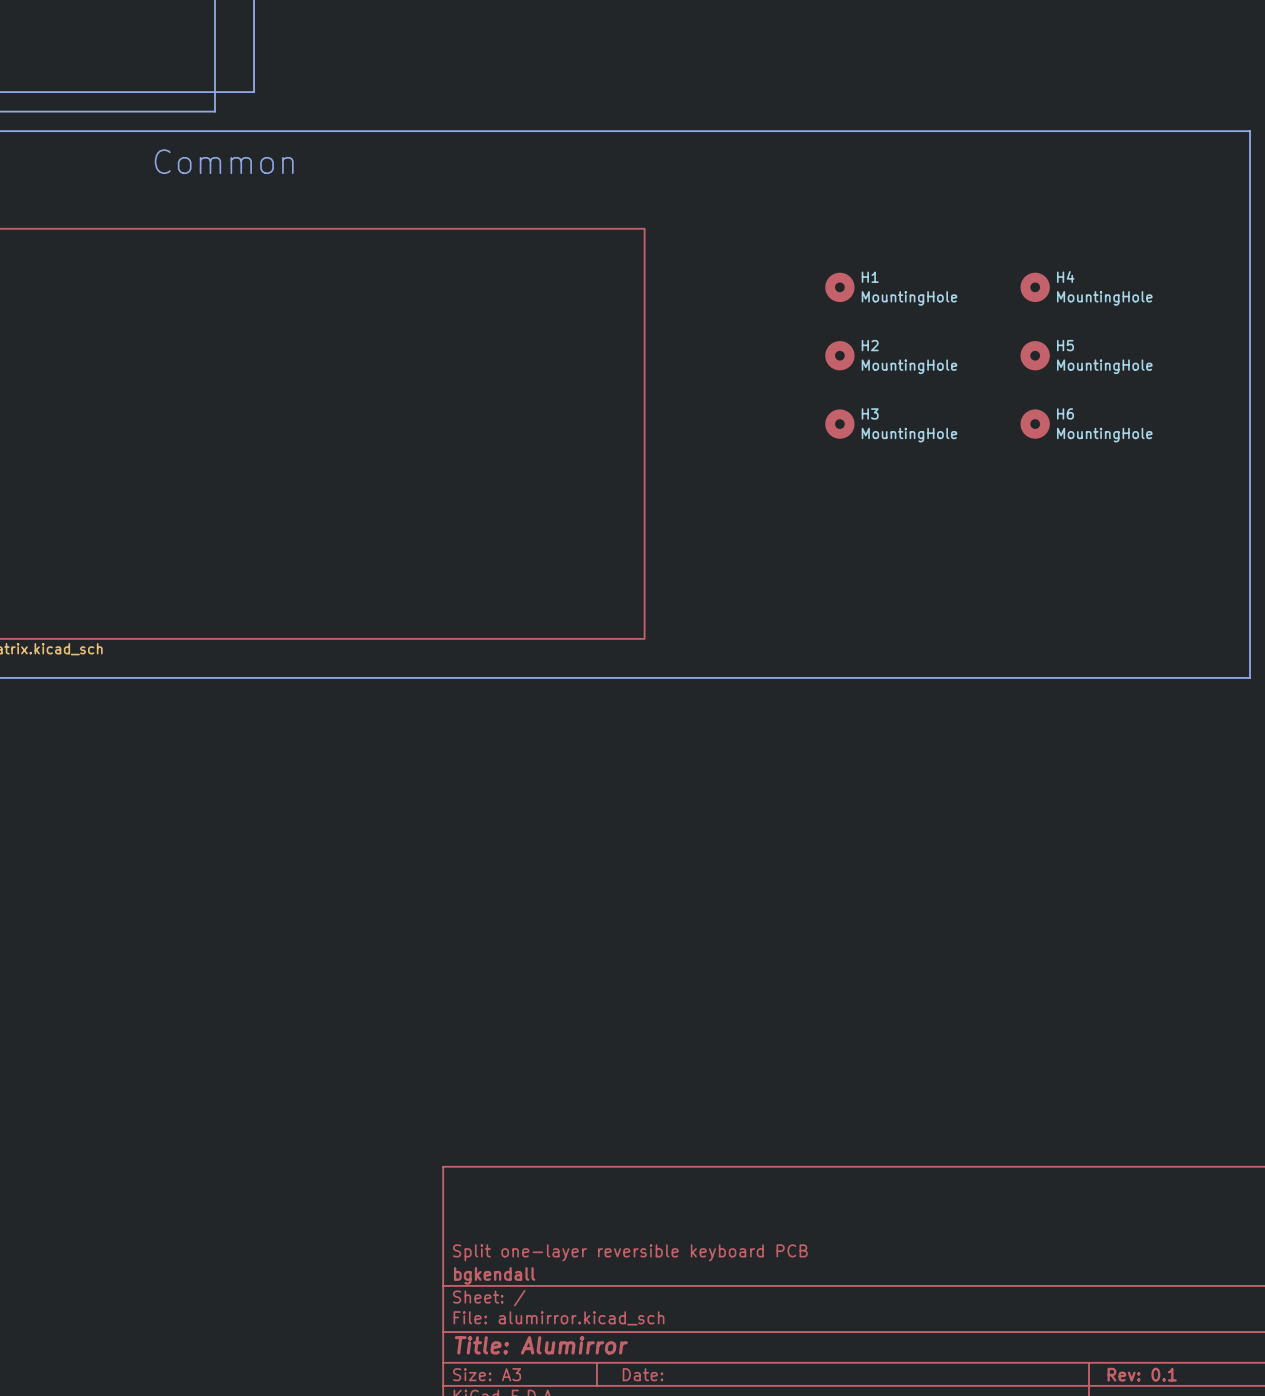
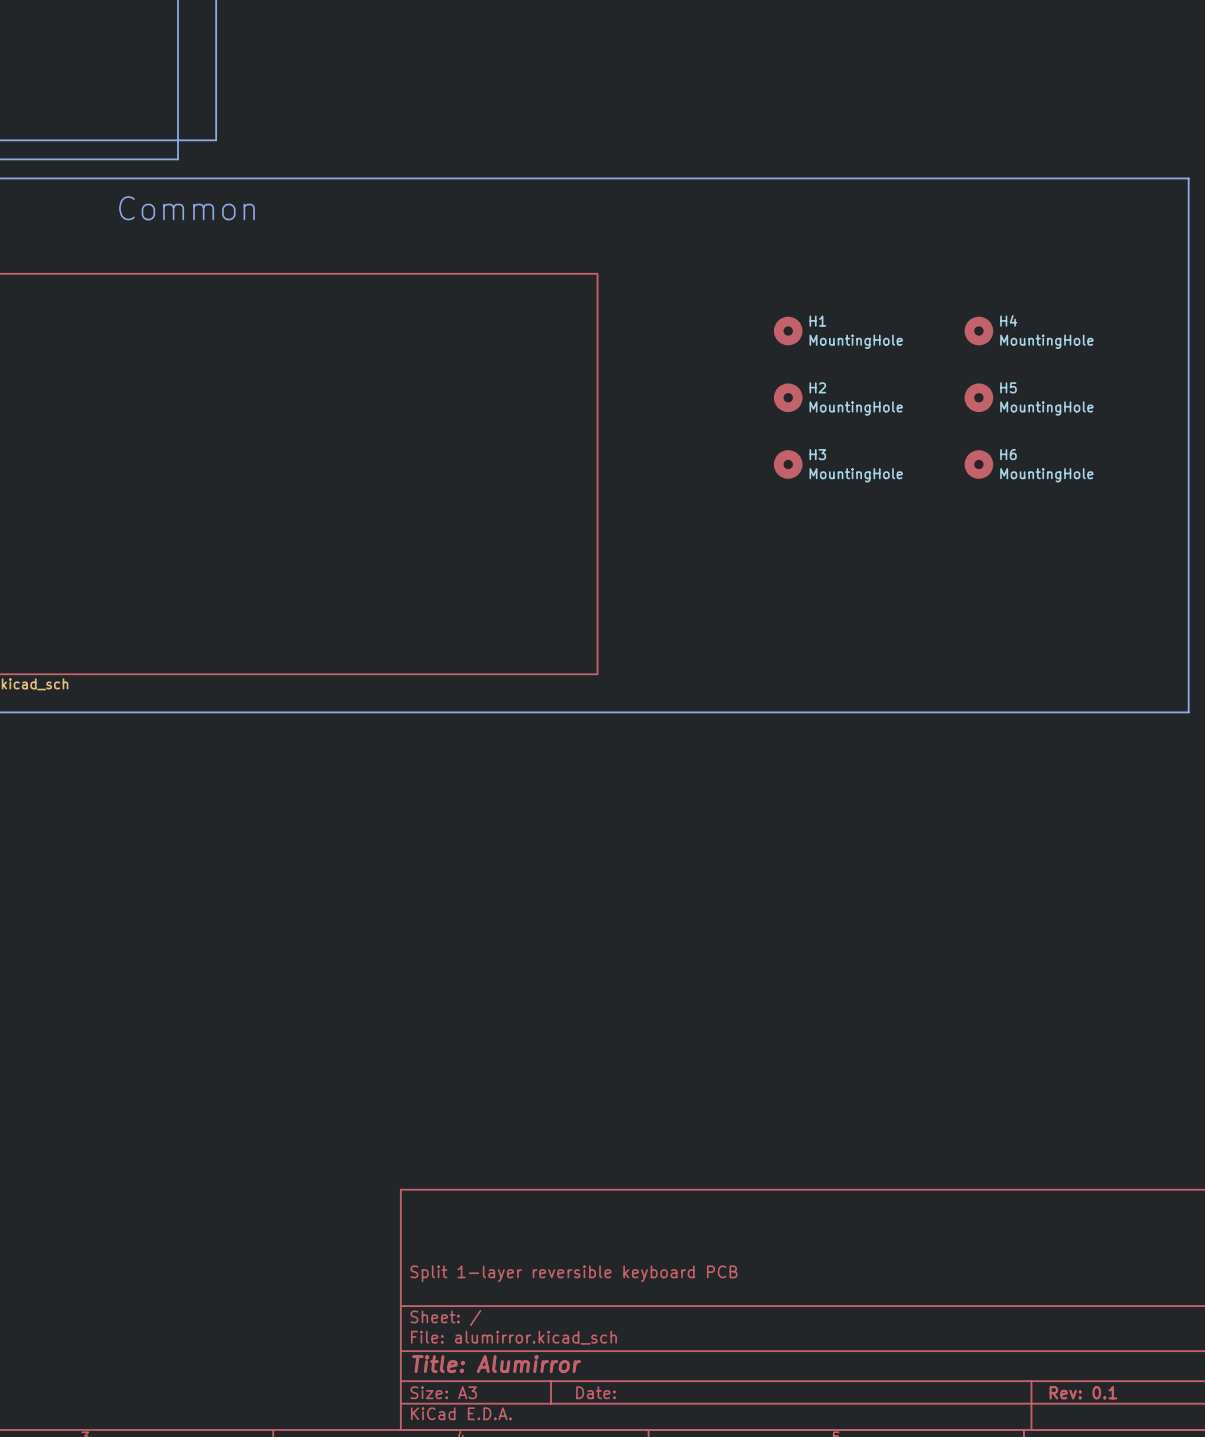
title block: Split one-layer reversible keyboard PCB (630, 1252) -> Split 1-layer reversible keyboard PCB (573, 1273)
title block: bgkendall (494, 1275) -> none

